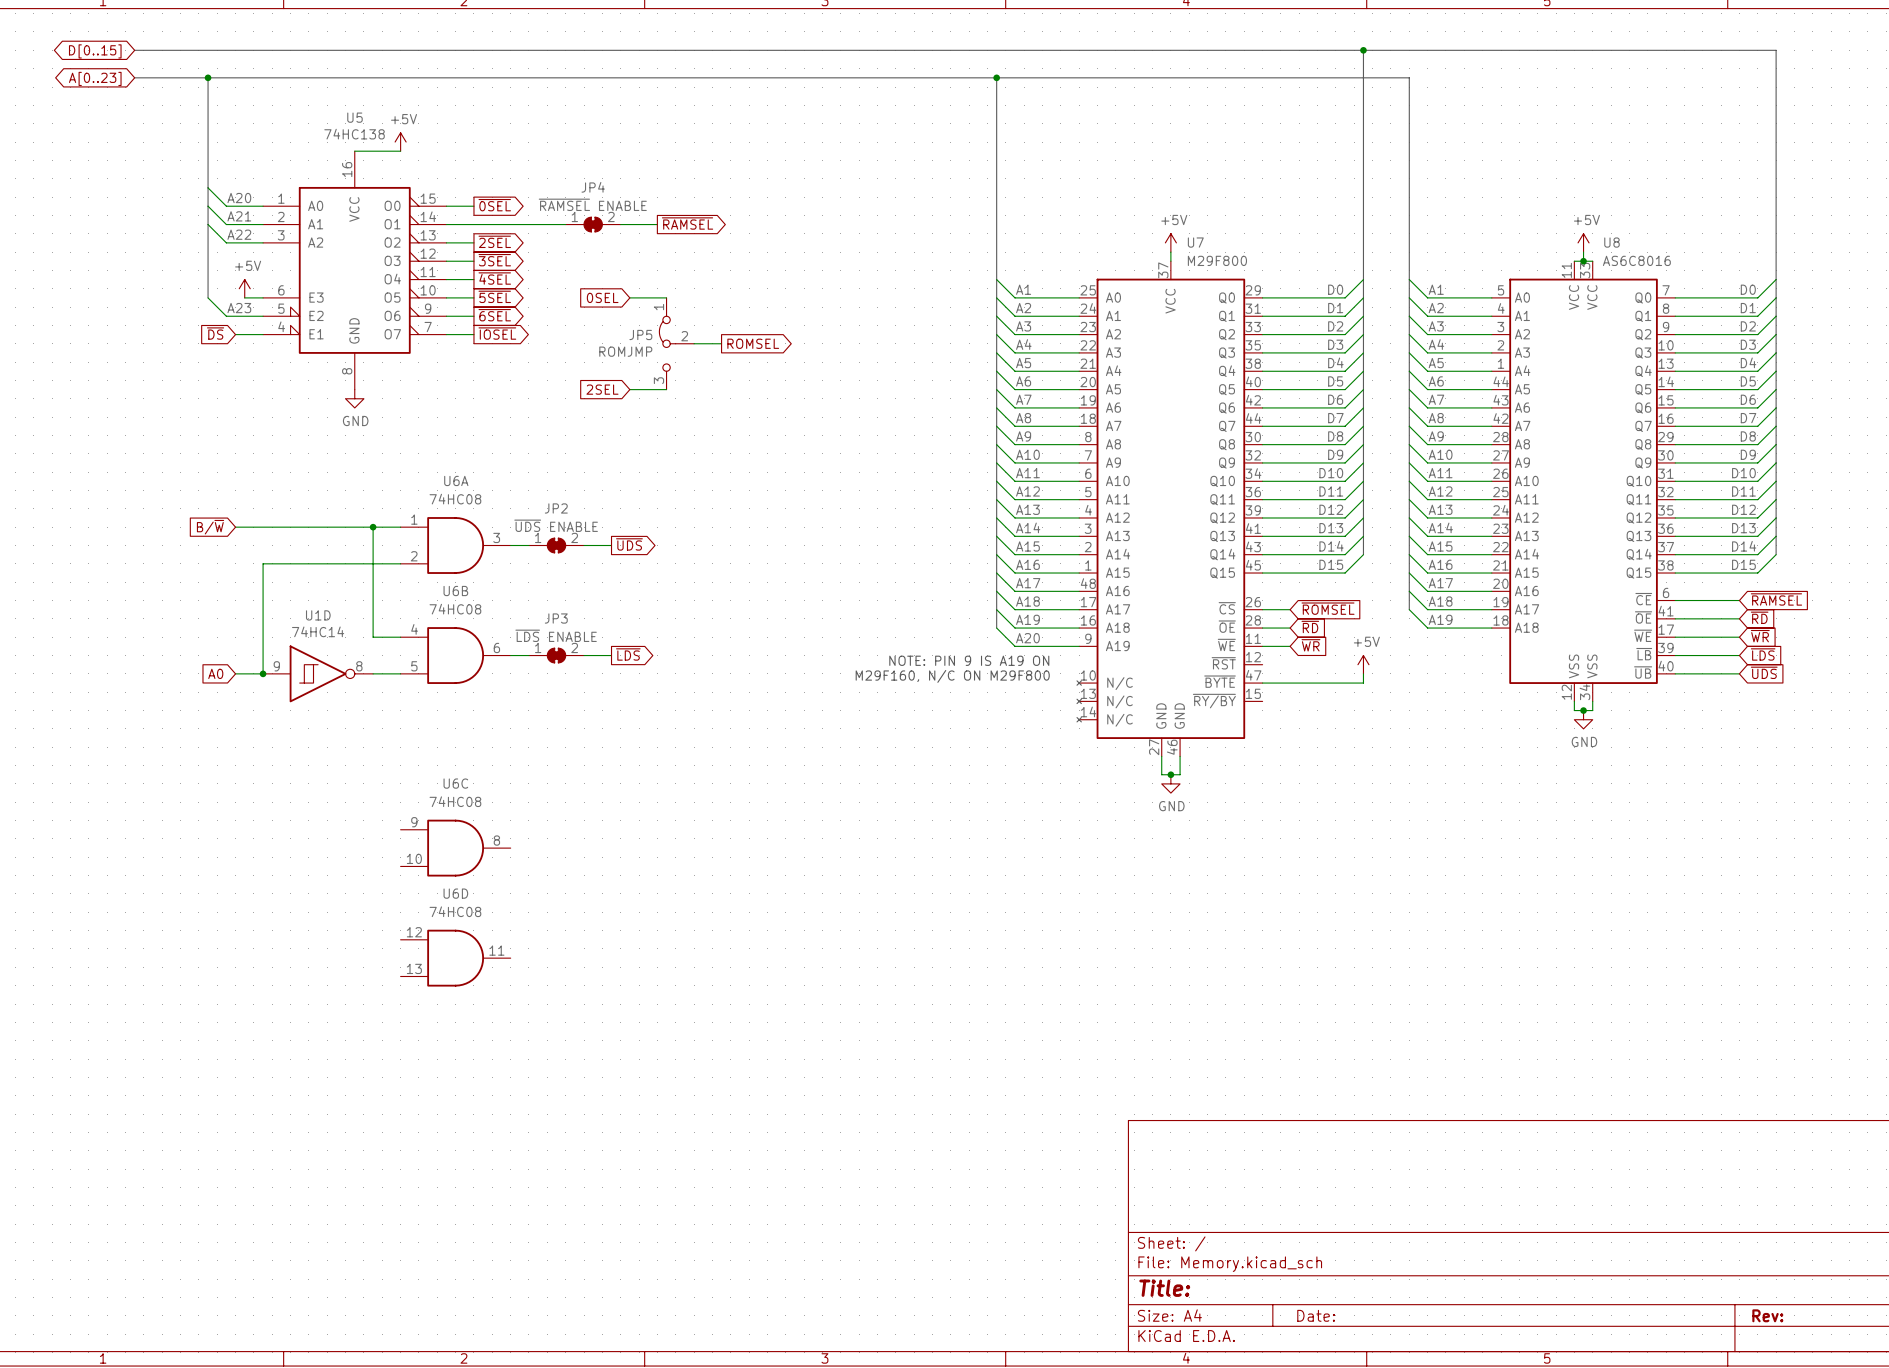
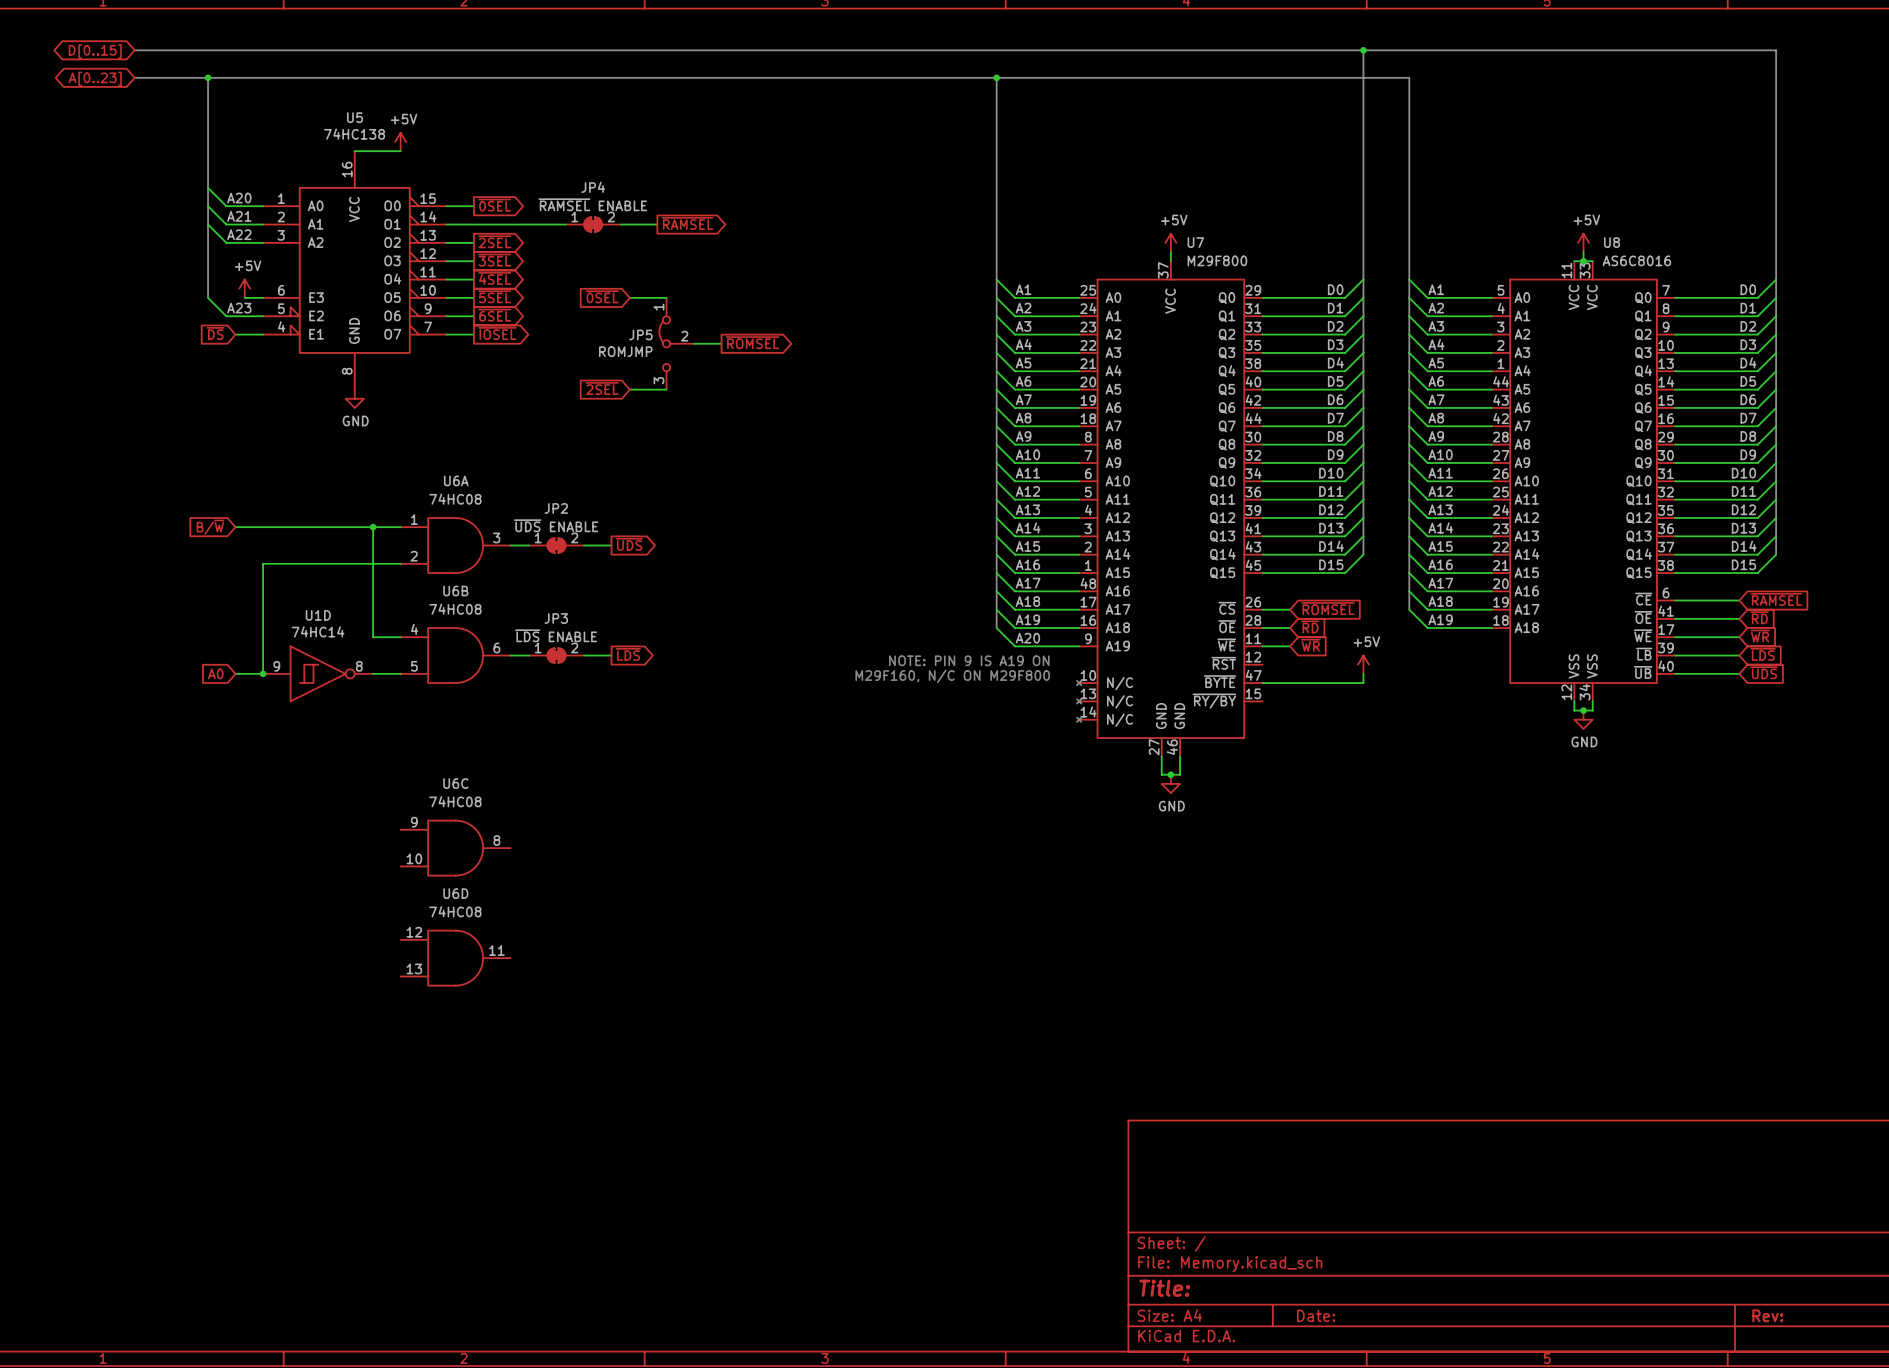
global label: 0SEL (602, 297) -> ~{0SEL} (602, 296)
global label: ROMSEL (753, 343) -> ~{ROMSEL} (752, 342)
global label: 2SEL (602, 389) -> ~{2SEL} (602, 388)

